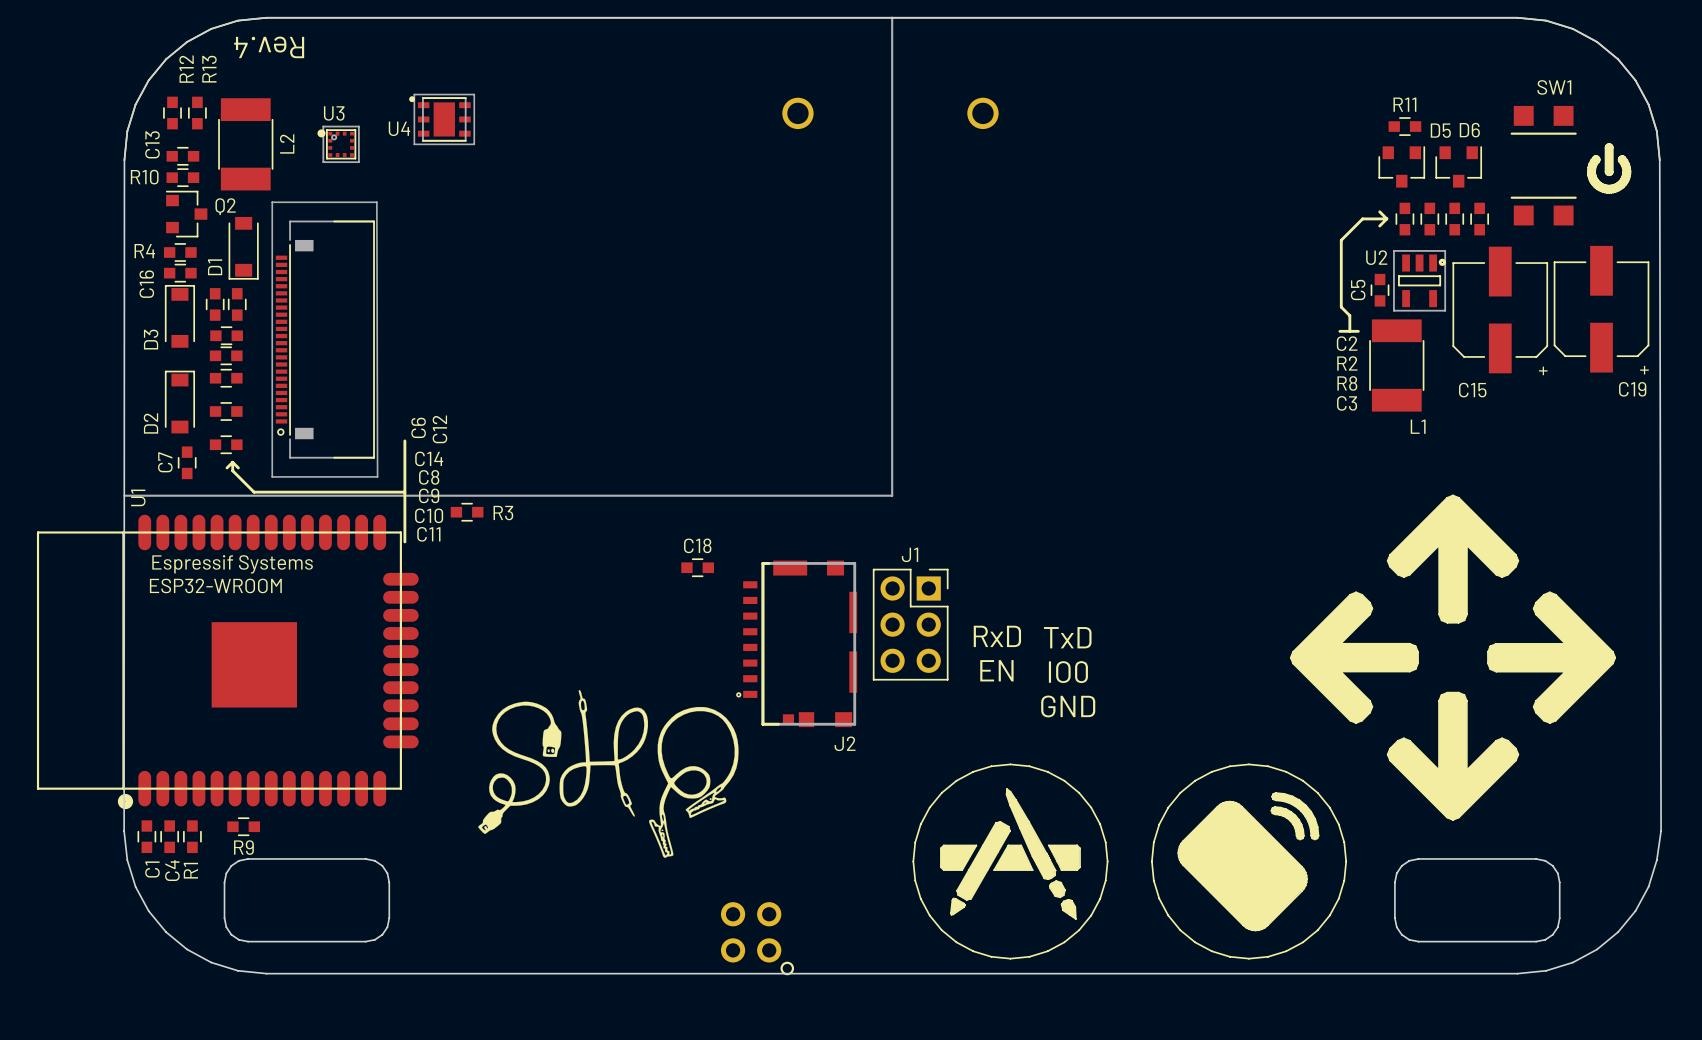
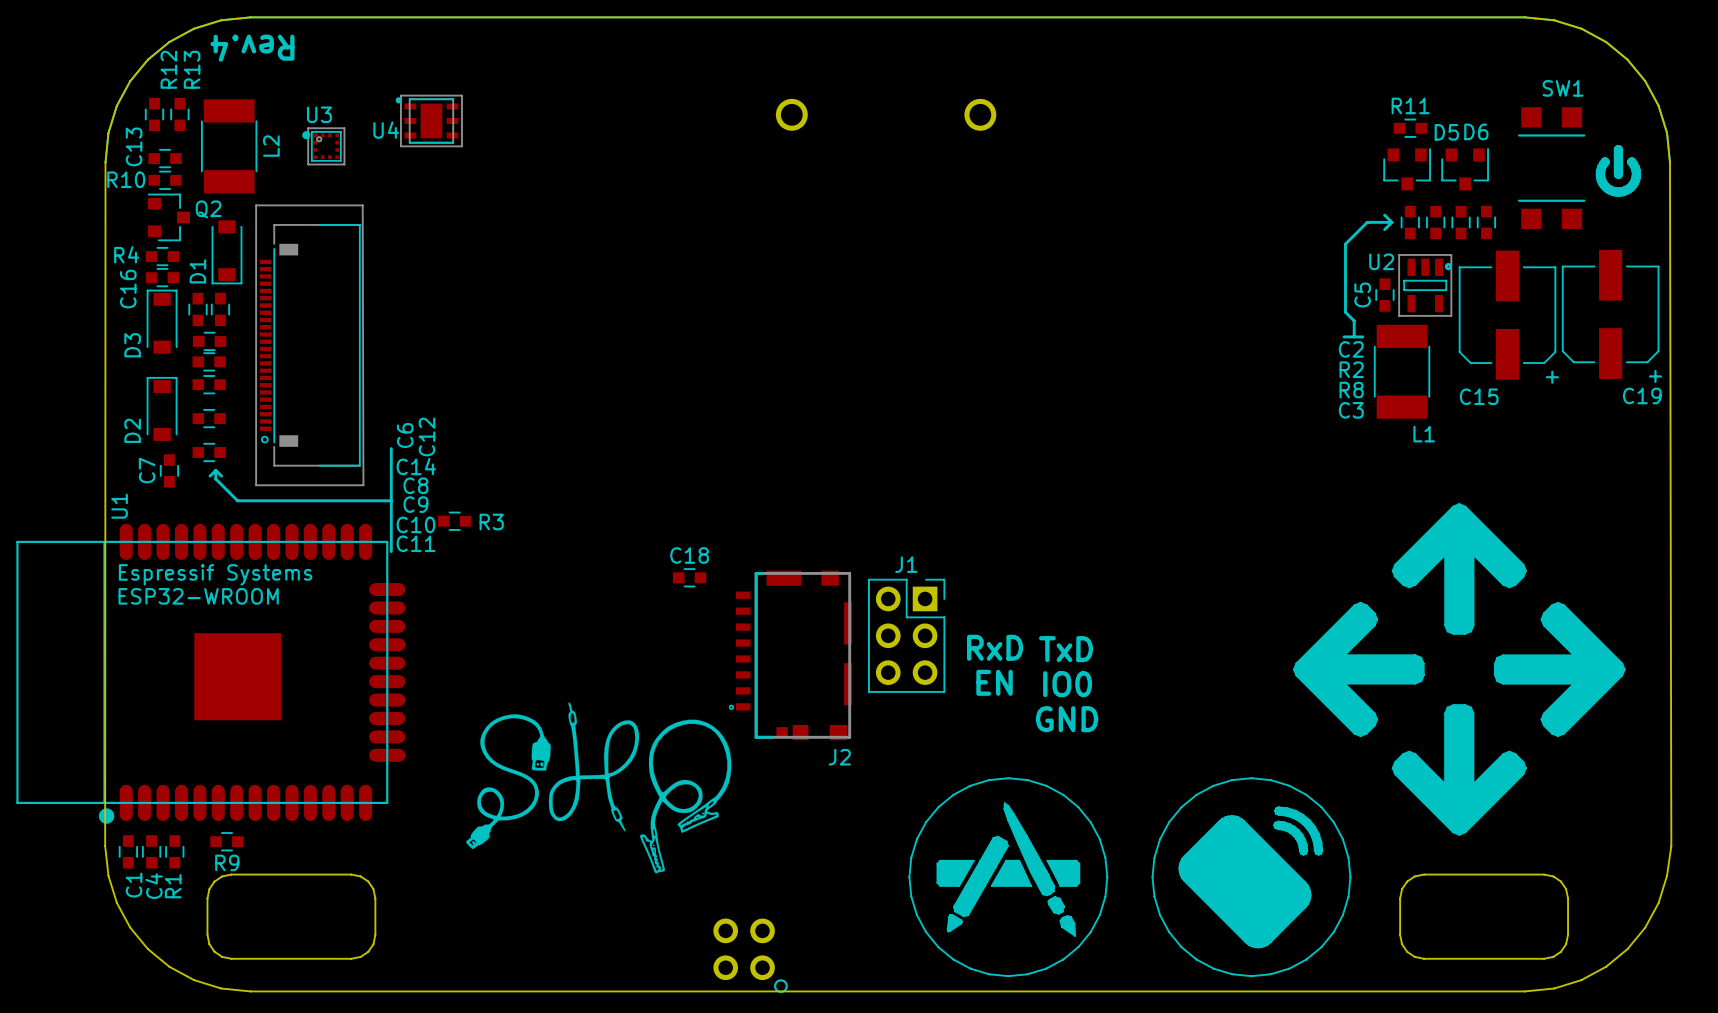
line: (892, 17) (892, 495) (124, 495) -> none

